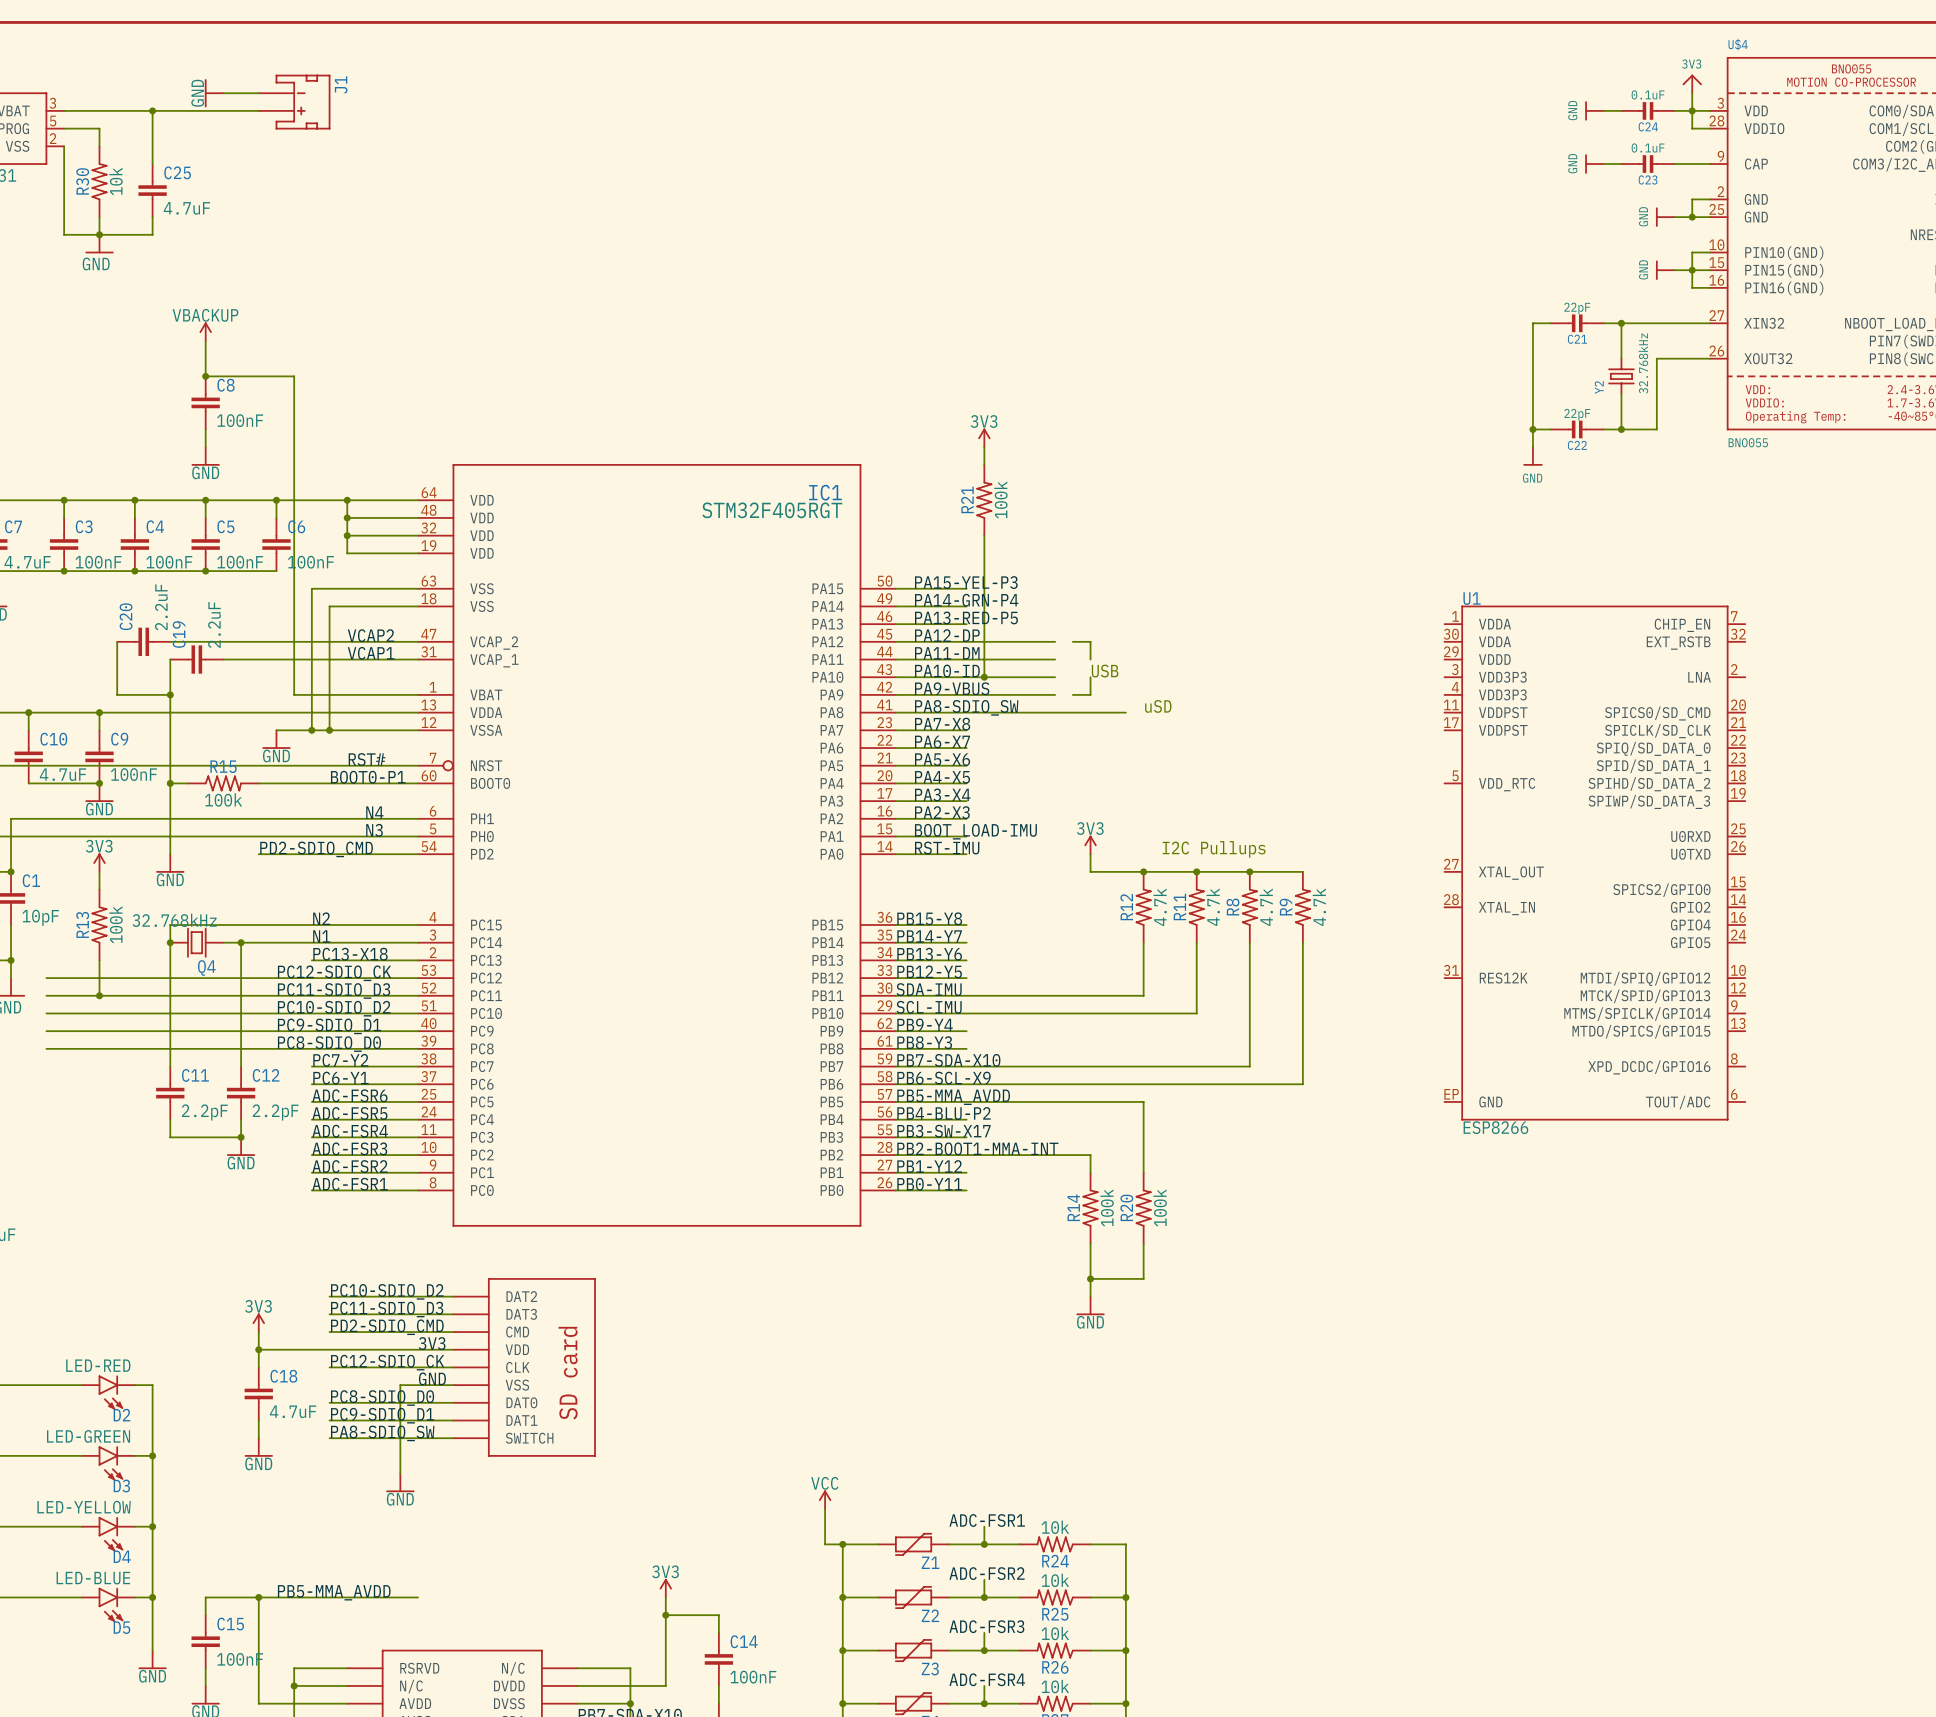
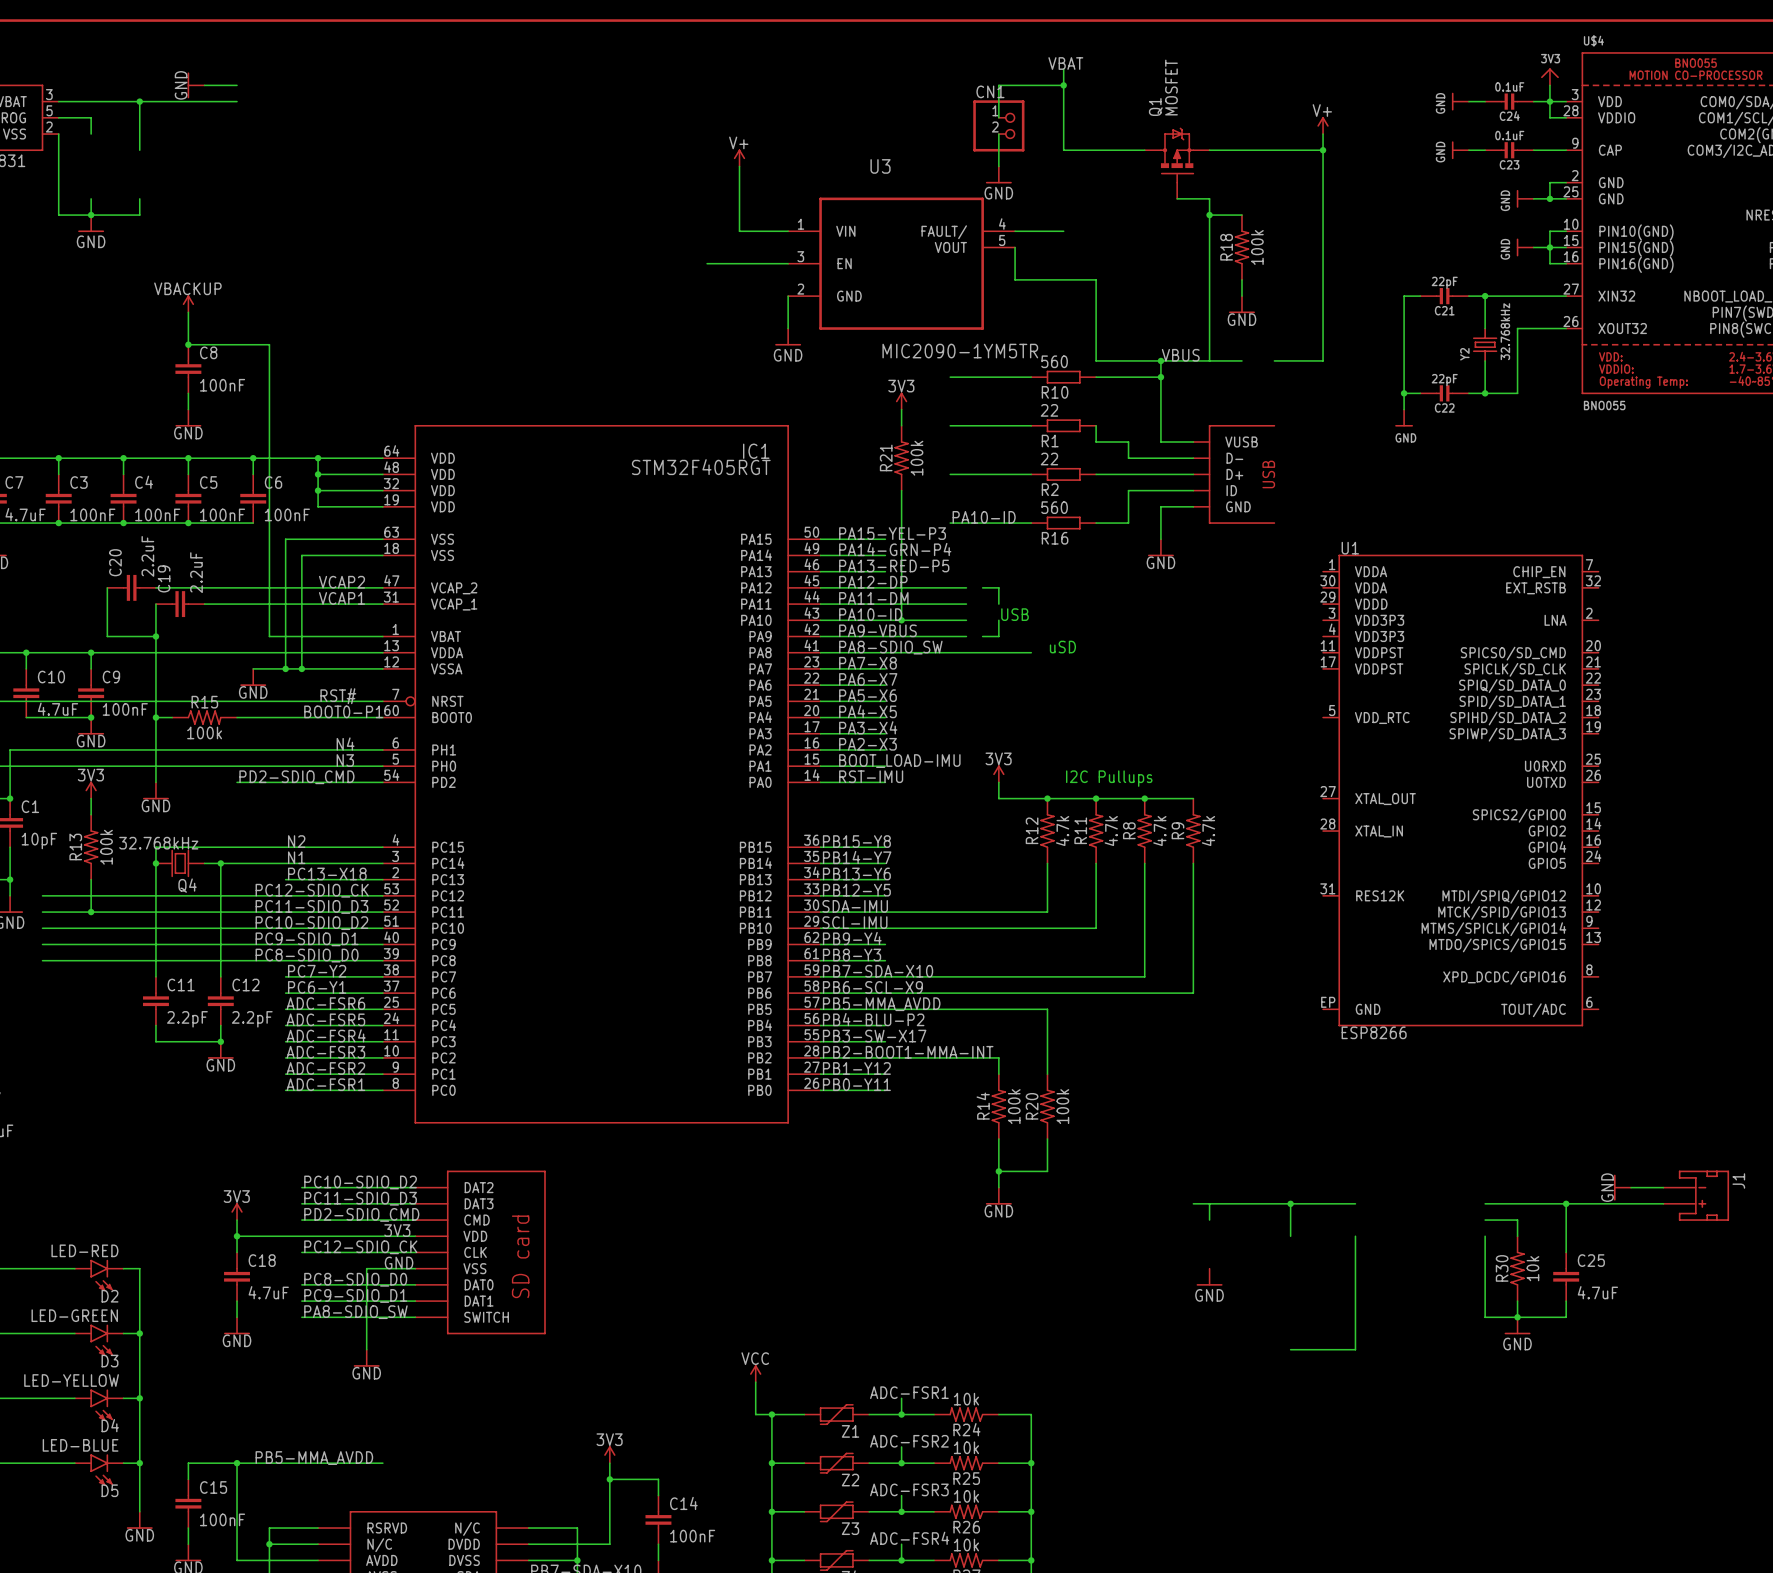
label: none -> VBAT (1065, 63)
wire: none -> (1063, 69) (1063, 150) (1144, 150)
wire: none -> (1063, 85) (998, 85) (998, 117)
junction: none -> (1063, 85)
J1 position: (294, 102) -> (1696, 1195)
CN1: none -> (998, 125)
power symbol: none -> V+ (1323, 125)
wire: none -> (998, 134) (998, 166)
wire: none -> (1323, 134) (1323, 360) (1274, 360)
wire: none -> (1209, 150) (1323, 150)
junction: none -> (1323, 150)
power symbol: none -> V+ (739, 157)
Q1: none -> MOSFET (1177, 163)
R30 position: (99, 181) -> (1517, 1268)
wire: none -> (739, 166) (739, 231) (788, 231)
C25 position: (152, 190) -> (1566, 1276)
power symbol: none -> GND (998, 174)
wire: none -> (1177, 198) (1209, 198) (1209, 360)
wire: none -> (1209, 215) (1241, 215)
junction: none -> (1209, 215)
wire: none -> (1015, 231) (1063, 231)
wire: none -> (1015, 247) (1015, 279) (1096, 279) (1096, 360) (1241, 360)
R18: none -> 100k (1241, 247)
wire: none -> (707, 263) (788, 263)
U3: none -> MIC2090-1YM5TR (901, 263)
wire: none -> (1241, 279) (1241, 296)
wire: none -> (788, 296) (788, 328)
power symbol: none -> GND (1241, 304)
power symbol: none -> GND (788, 337)
label: none -> VBUS (1180, 355)
wire: none -> (1160, 360) (1160, 442) (1193, 442)
junction: none -> (1160, 360)
wire: none -> (950, 377) (1031, 377)
R10: none -> 560 (1063, 377)
wire: none -> (1096, 377) (1160, 377)
junction: none -> (1160, 377)
wire: none -> (950, 425) (1031, 425)
R1: none -> 22 (1063, 425)
wire: none -> (1096, 425) (1096, 442) (1128, 442) (1128, 458) (1193, 458)
wire: none -> (950, 474) (1031, 474)
R2: none -> 22 (1063, 474)
wire: none -> (1096, 474) (1193, 474)
part: none -> (1234, 474)
wire: none -> (1193, 490) (1128, 490) (1128, 523) (1096, 523)
wire: none -> (1193, 506) (1160, 506) (1160, 539)
label: none -> PA10-ID (984, 517)
wire: none -> (950, 523) (1031, 523)
R16: none -> 560 (1063, 523)
power symbol: none -> GND (1160, 547)
power symbol: none -> GND (1622, 1187)
wire: none -> (1631, 1187) (1663, 1187)
wire: none -> (1193, 1203) (1355, 1203)
wire: none -> (1209, 1203) (1209, 1220)
wire: none -> (1290, 1203) (1290, 1236)
junction: none -> (1290, 1203)
wire: none -> (1485, 1203) (1663, 1203)
wire: none -> (1566, 1203) (1566, 1252)
junction: none -> (1566, 1203)
wire: none -> (1485, 1220) (1517, 1220) (1517, 1236)
wire: none -> (1355, 1236) (1355, 1349) (1290, 1349)
wire: none -> (1485, 1236) (1485, 1317) (1566, 1317) (1566, 1301)
power symbol: none -> GND (1209, 1277)
wire: none -> (1517, 1301) (1517, 1317)
junction: none -> (1517, 1317)
power symbol: none -> GND (1517, 1325)

